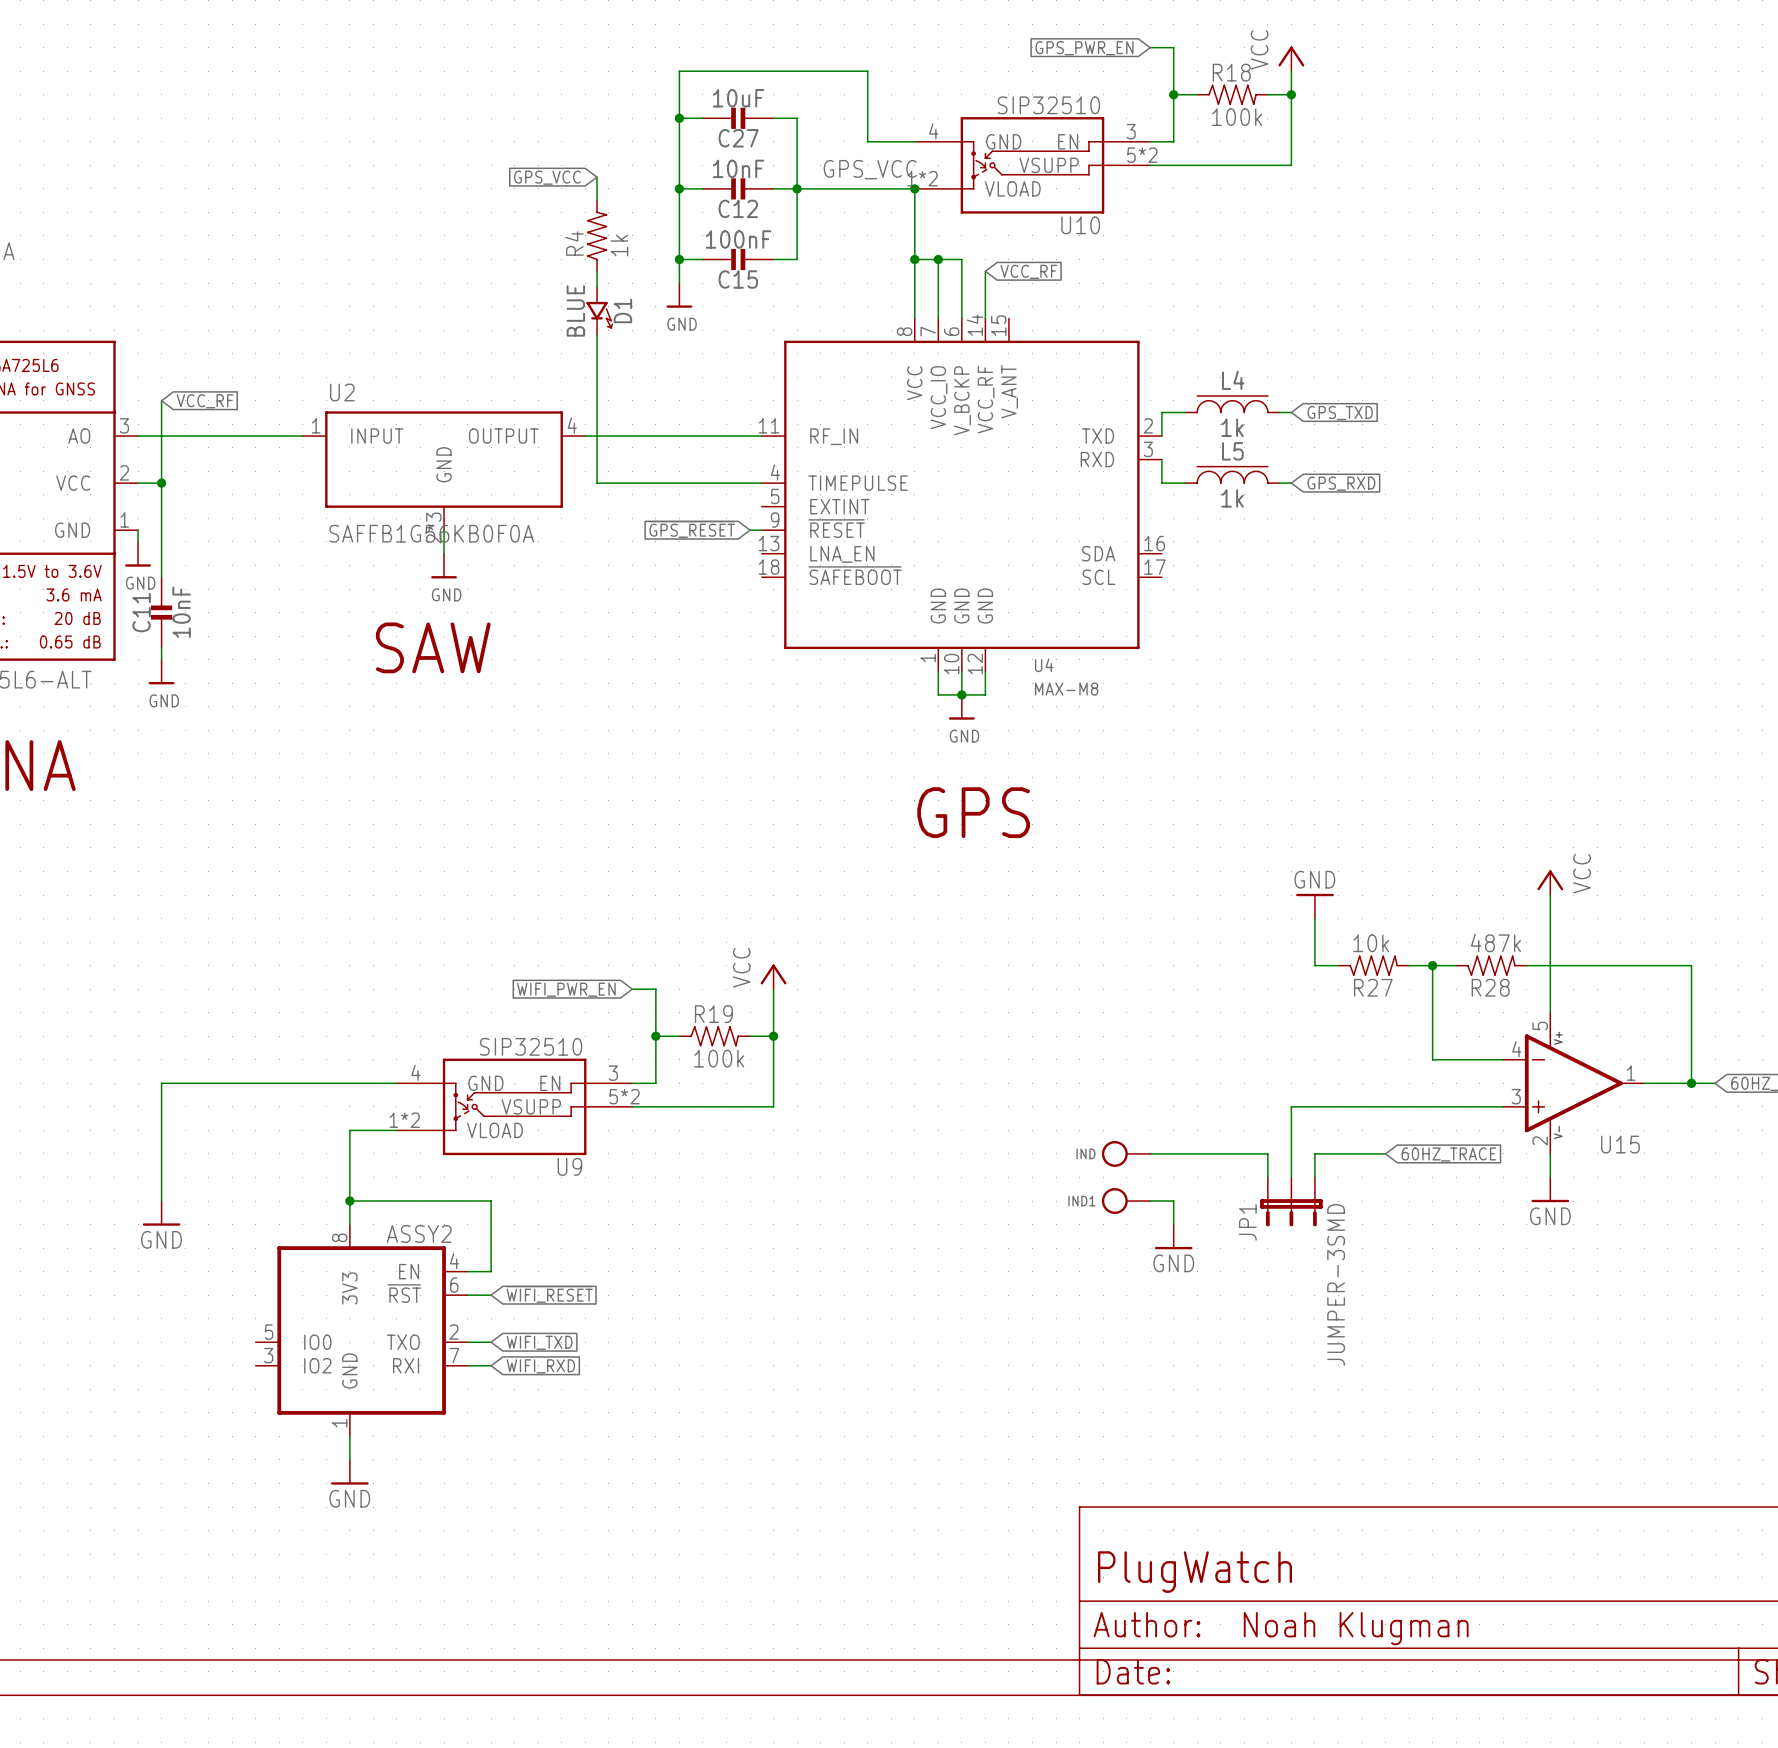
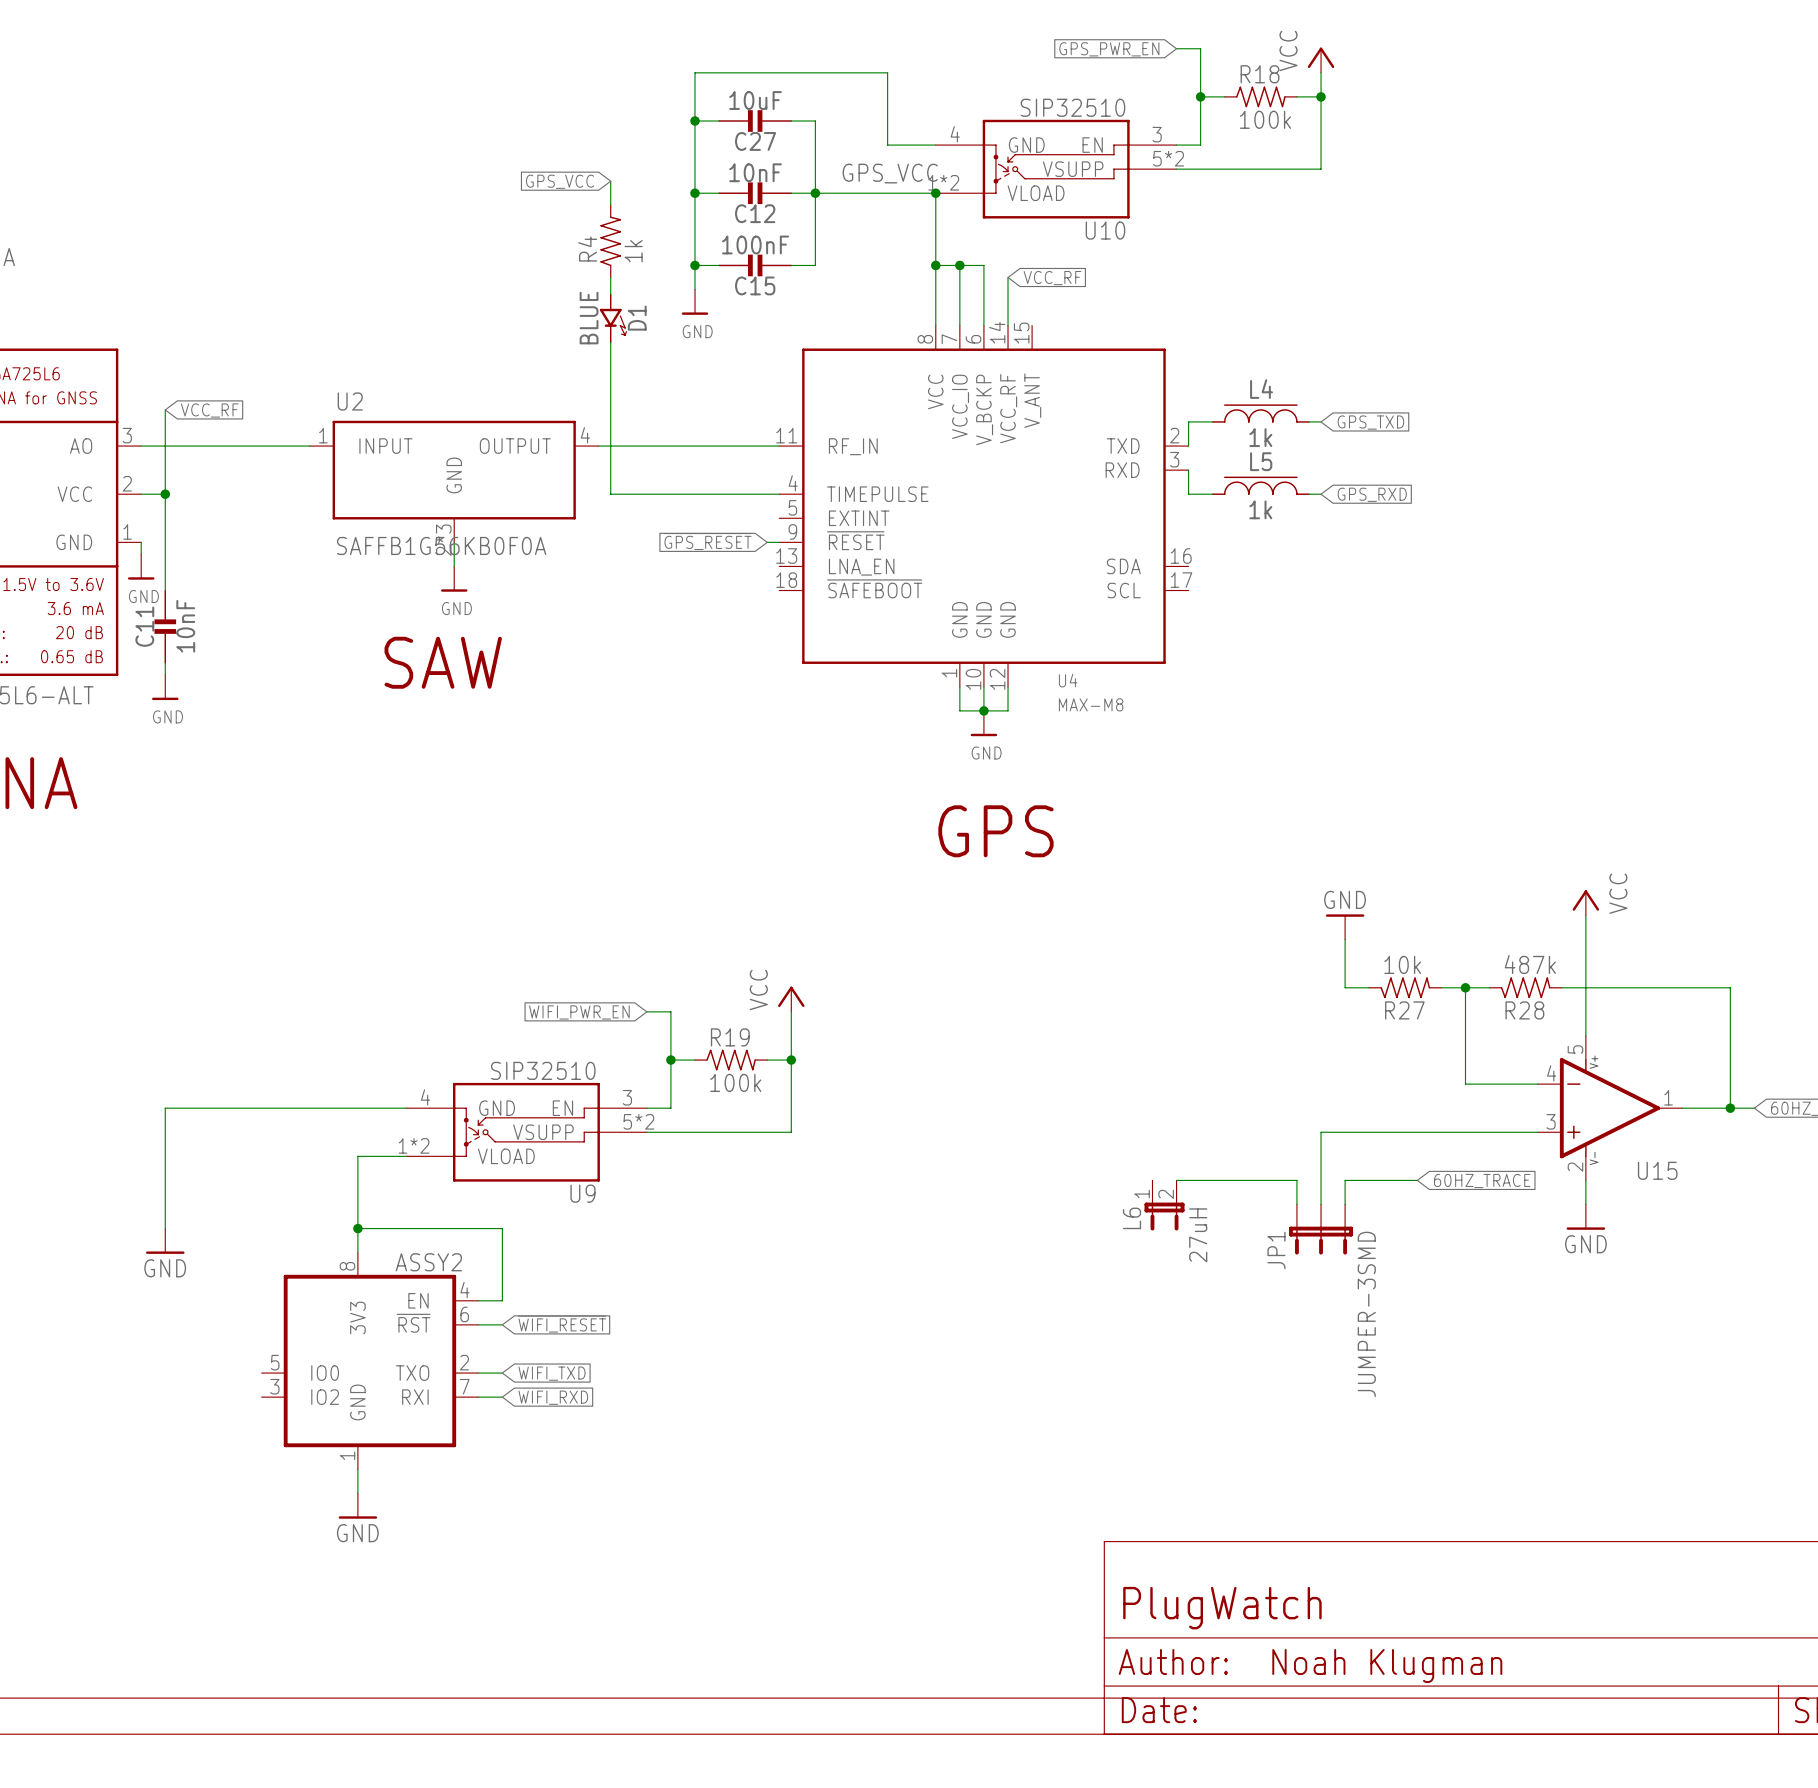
IND: (1126, 1153) -> none
L6: none -> 27uH (1164, 1205)
IND1: (1126, 1201) -> none
wire: (1150, 1201) (1173, 1201) (1173, 1224) -> none
power symbol: GND (1173, 1236) -> none

